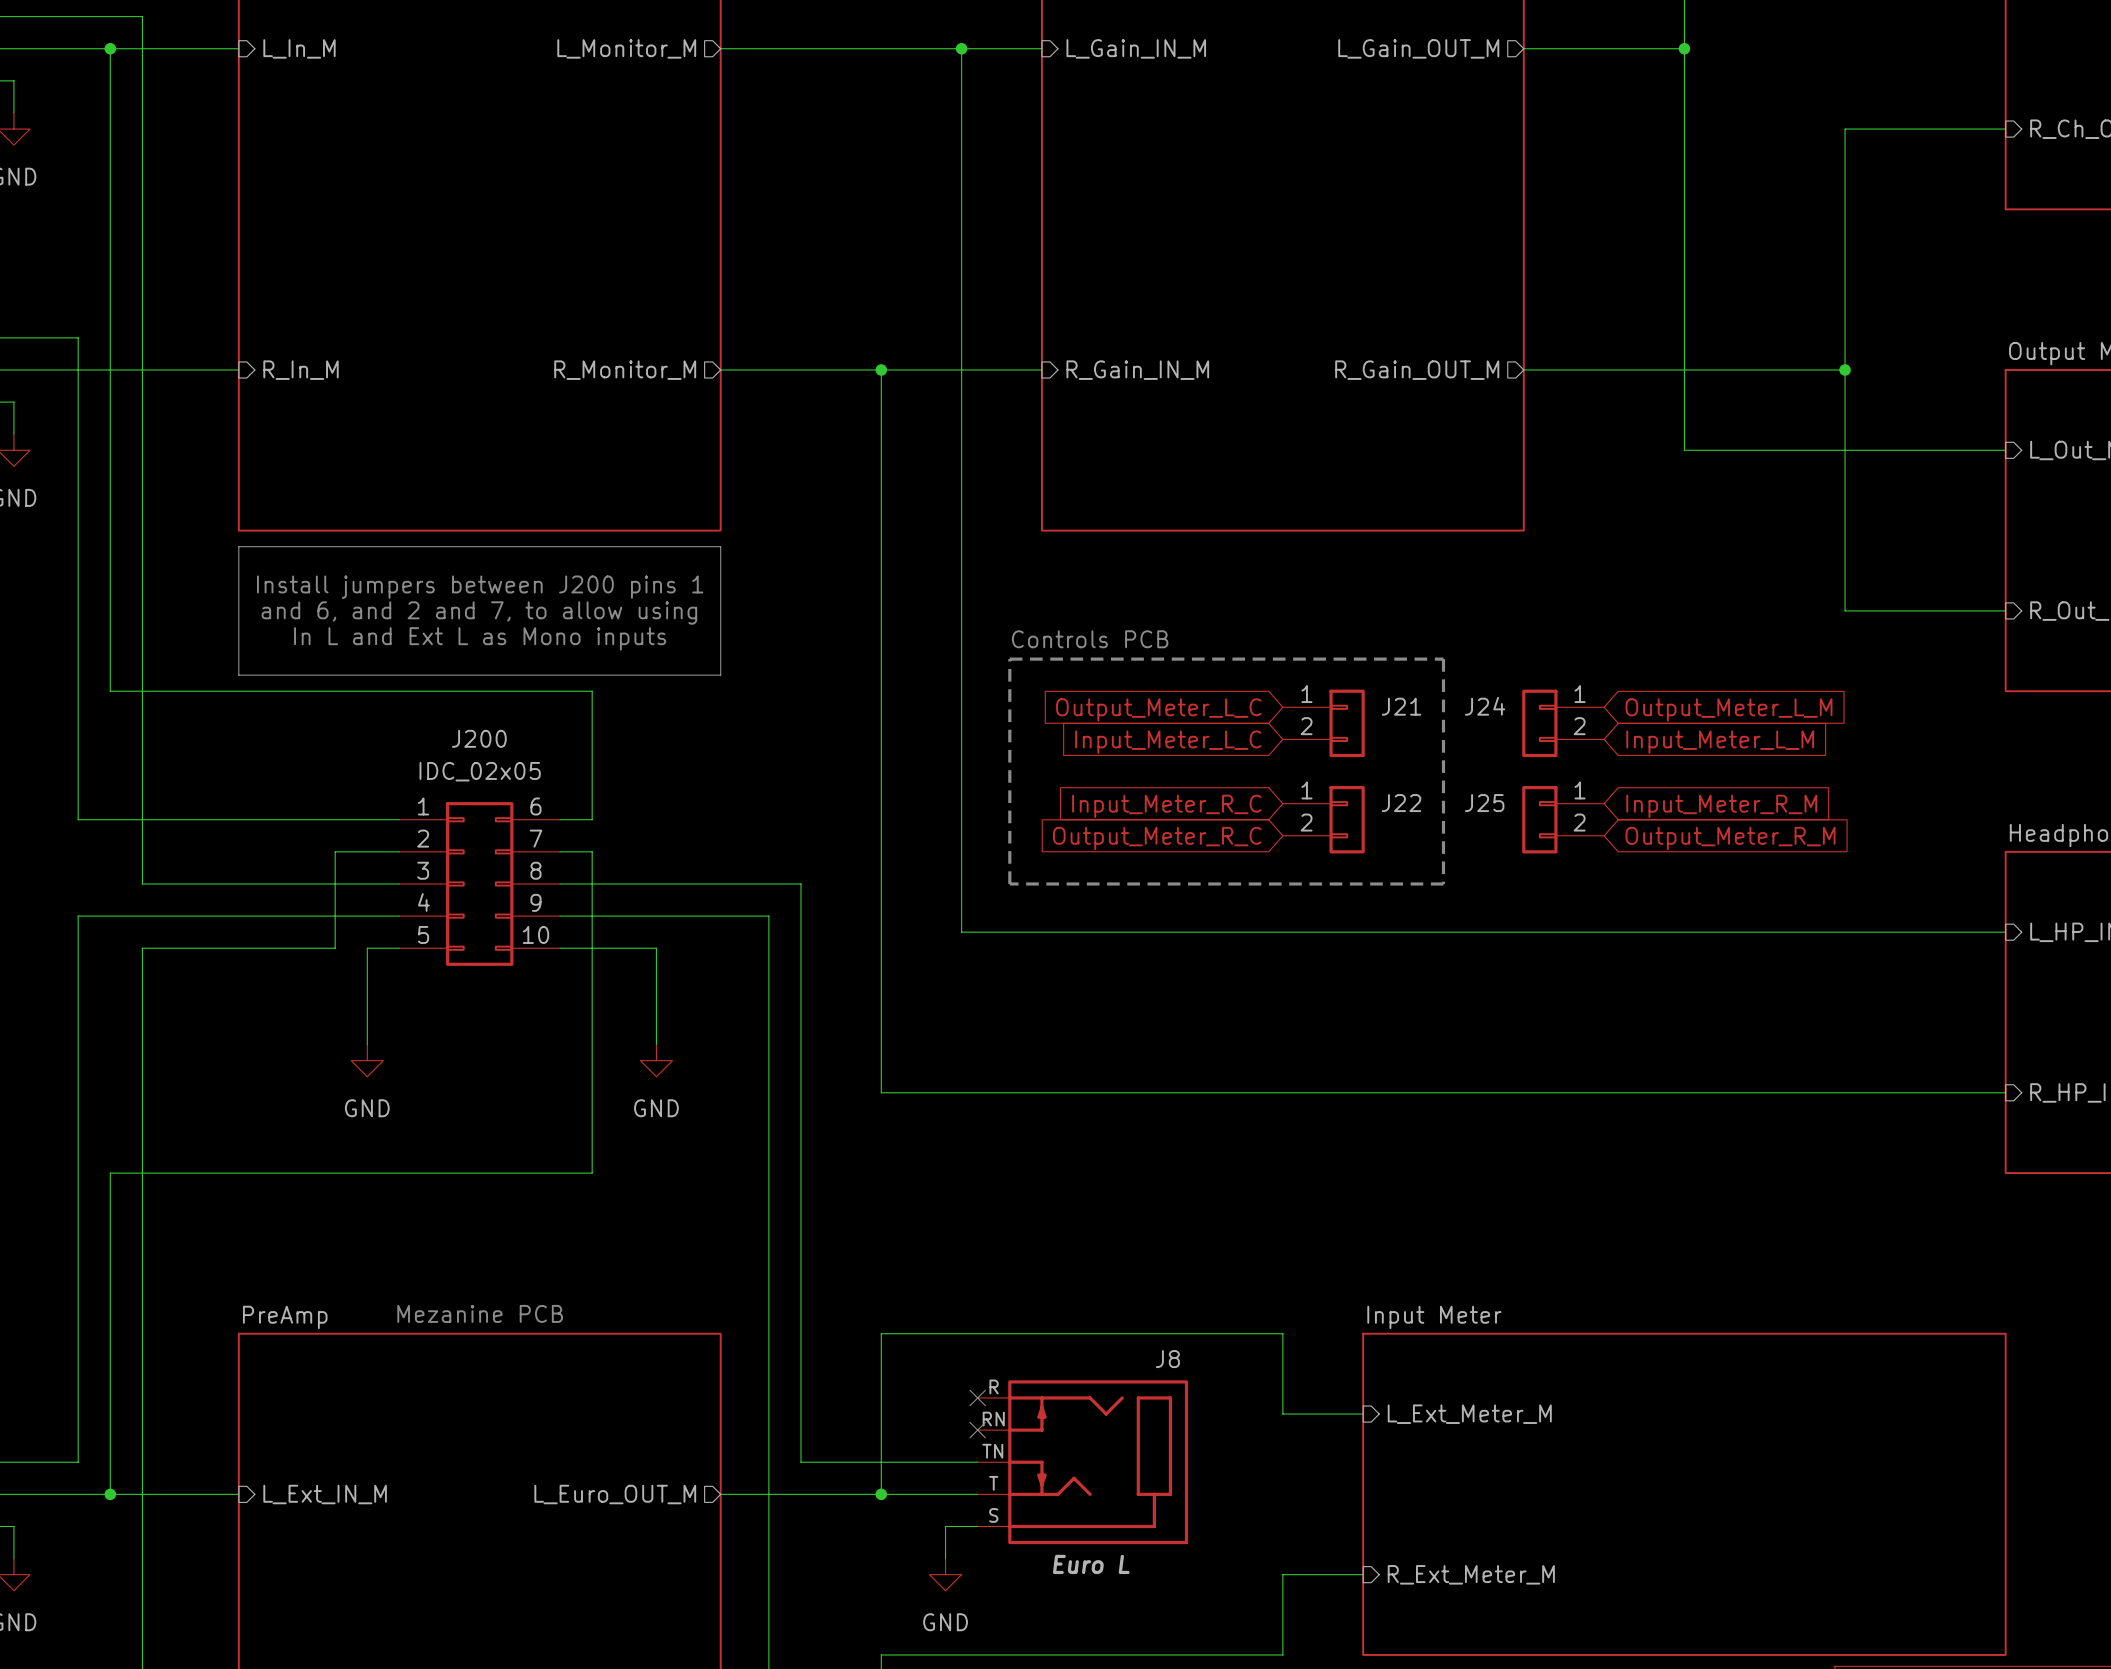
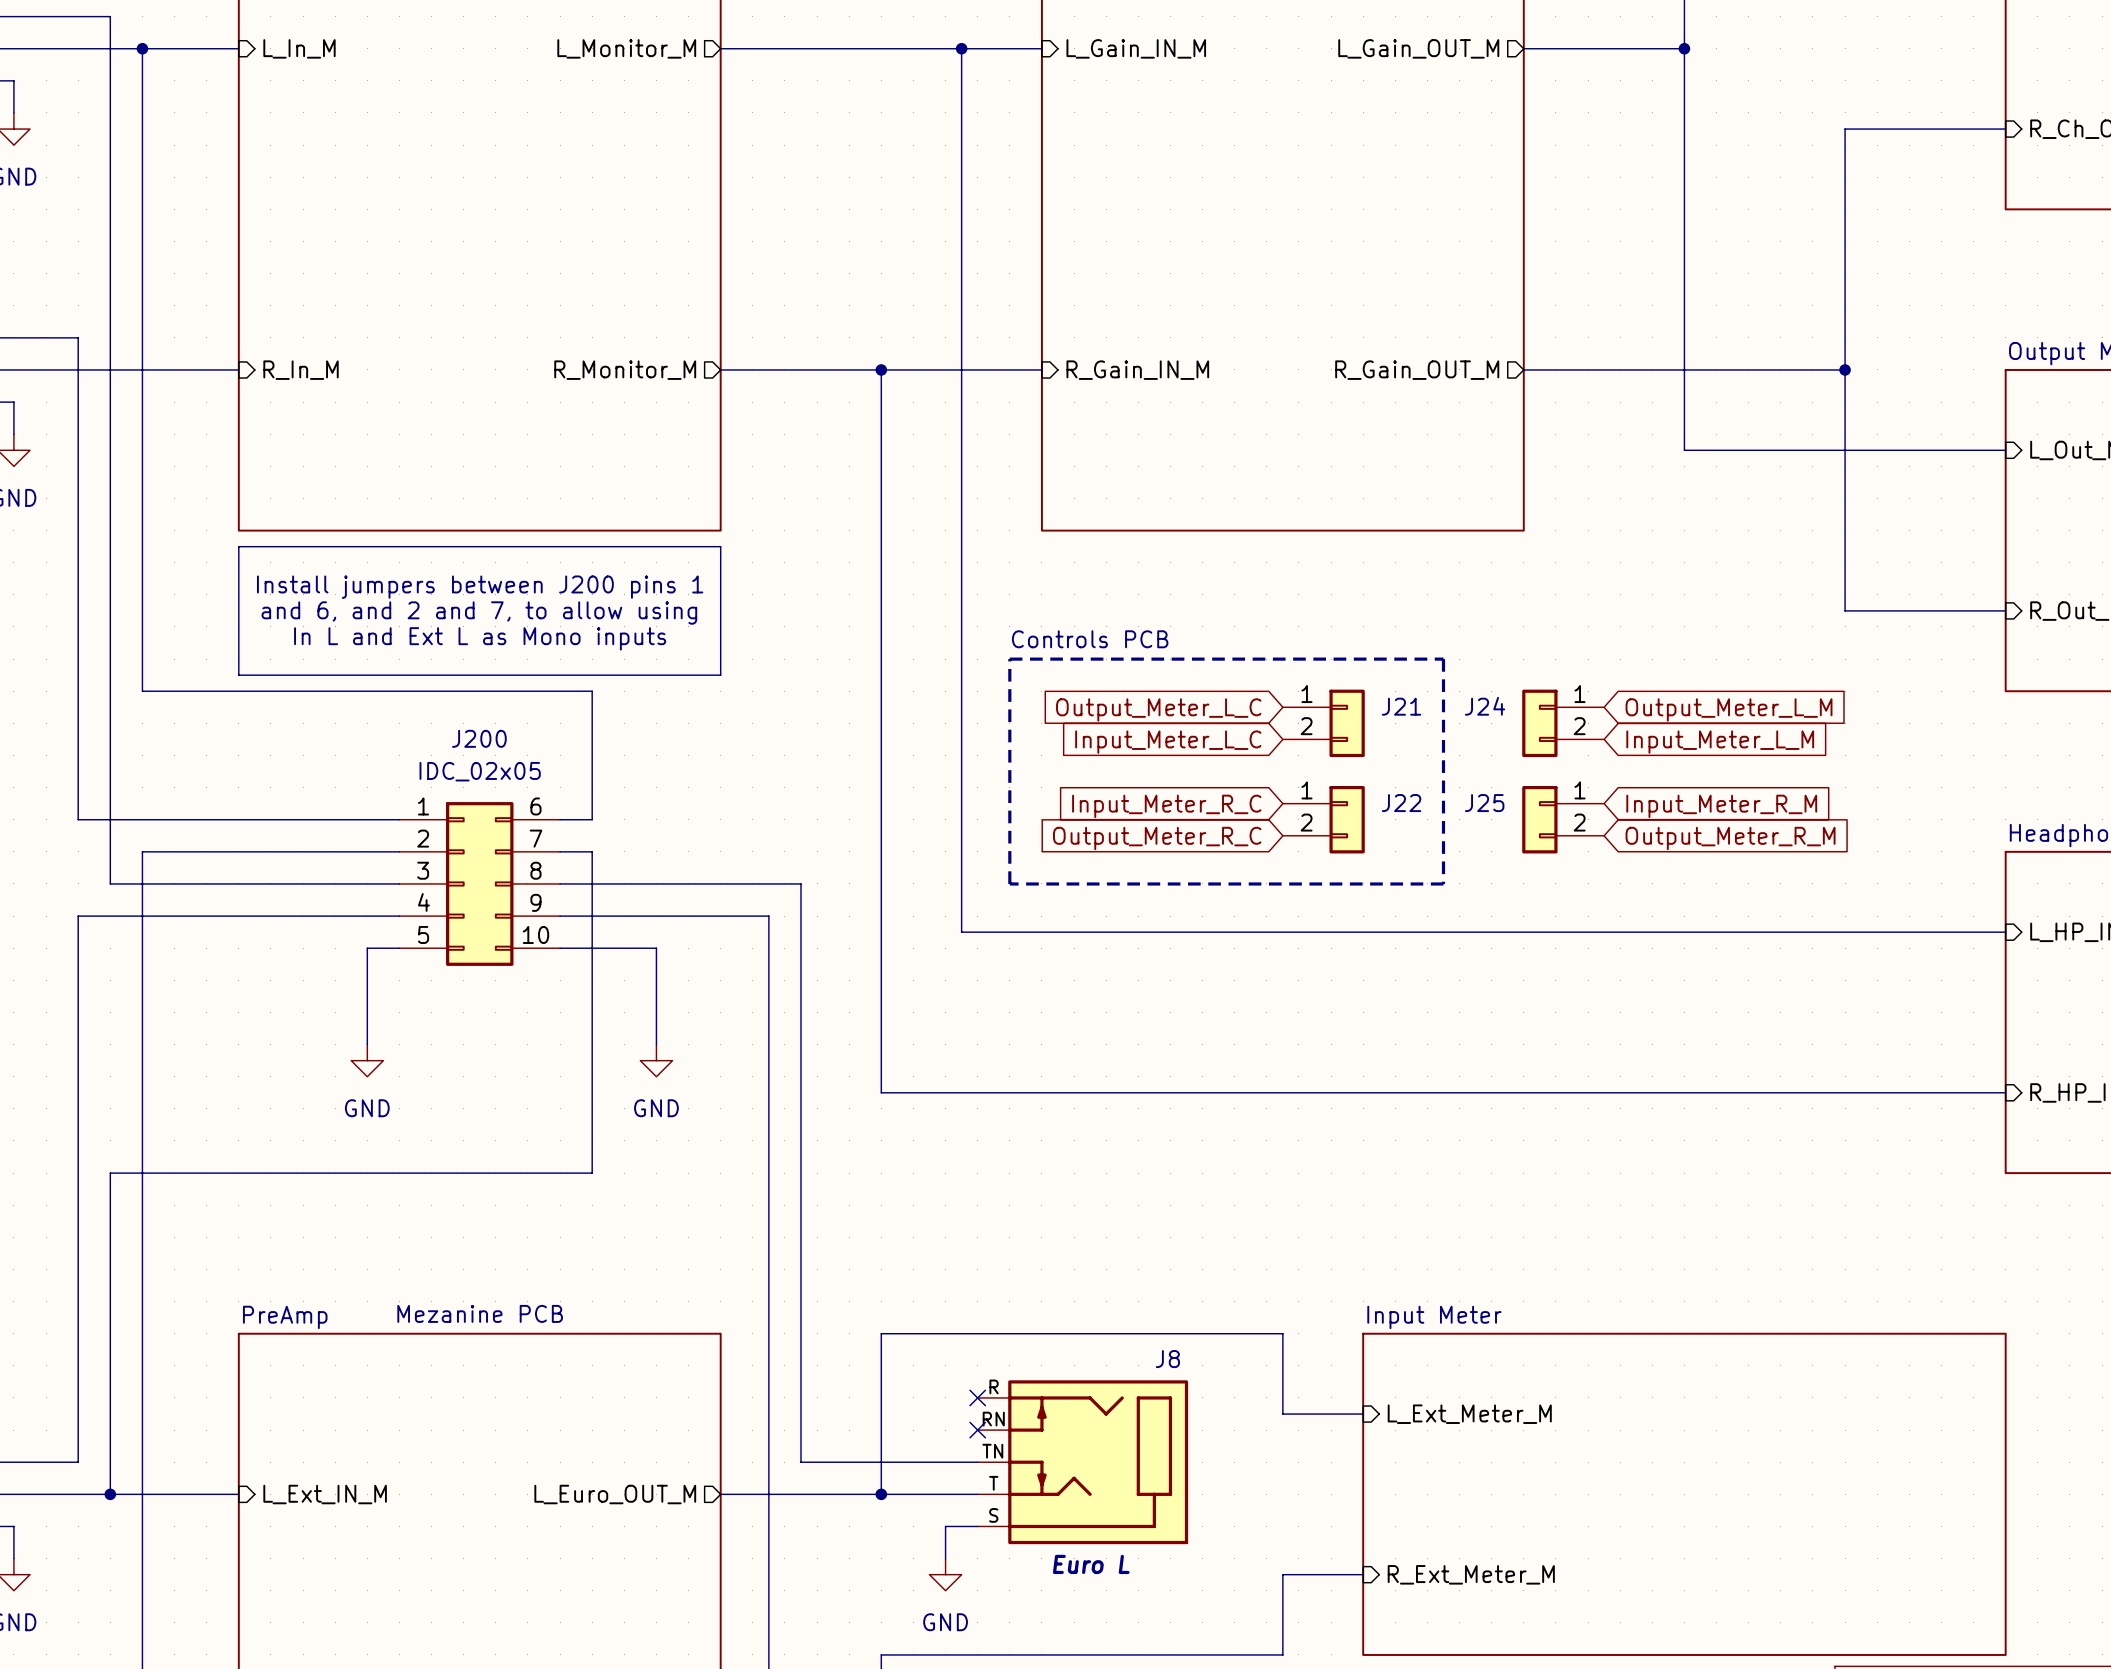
wire: (110, 16) (142, 16) (142, 48) -> (110, 16) (110, 48)
junction position: (110, 48) -> (142, 48)
wire: (110, 691) (142, 691) (142, 851) -> (110, 691) (110, 883) (142, 883) (142, 948)
wire: (335, 851) (335, 948) (142, 948) -> (335, 851) (142, 851)

